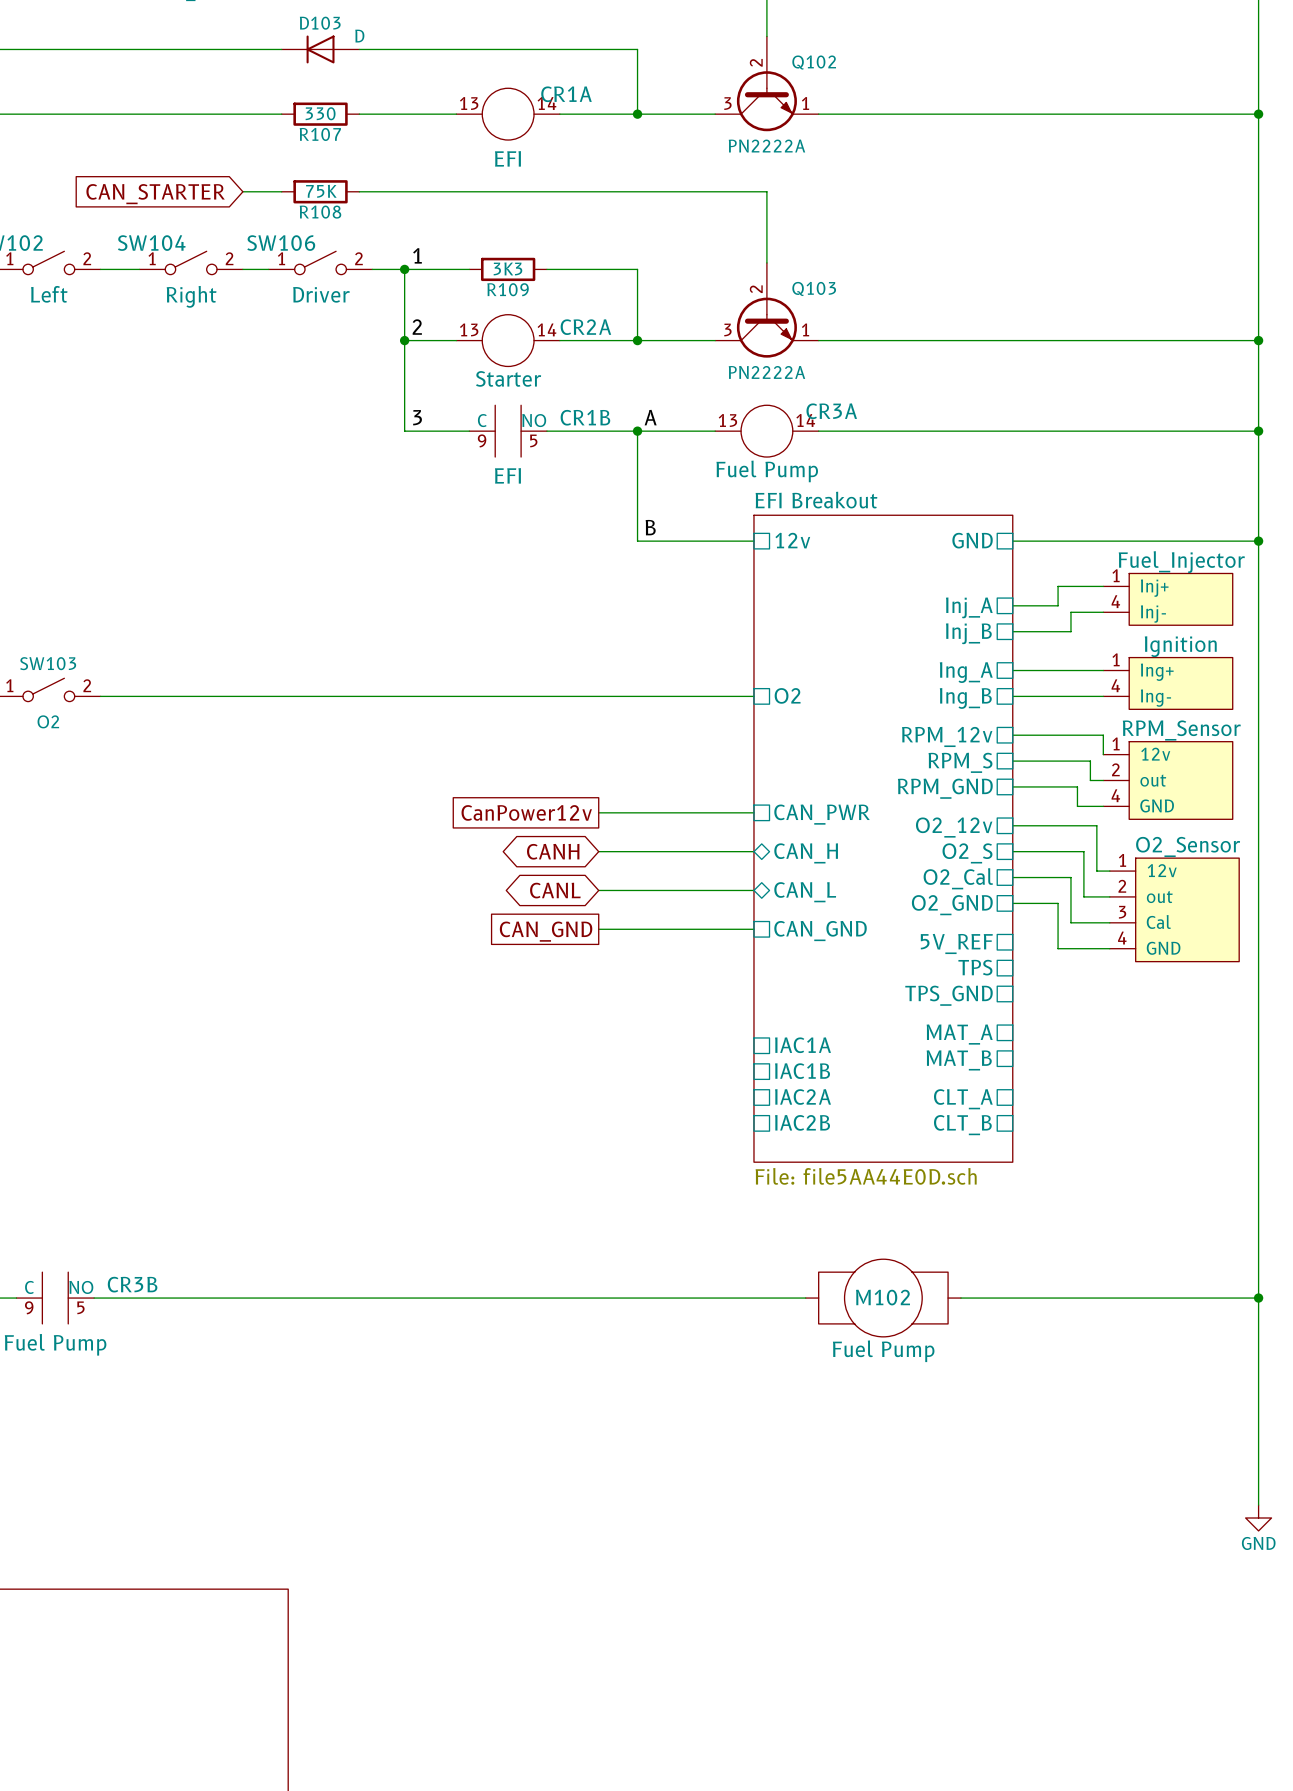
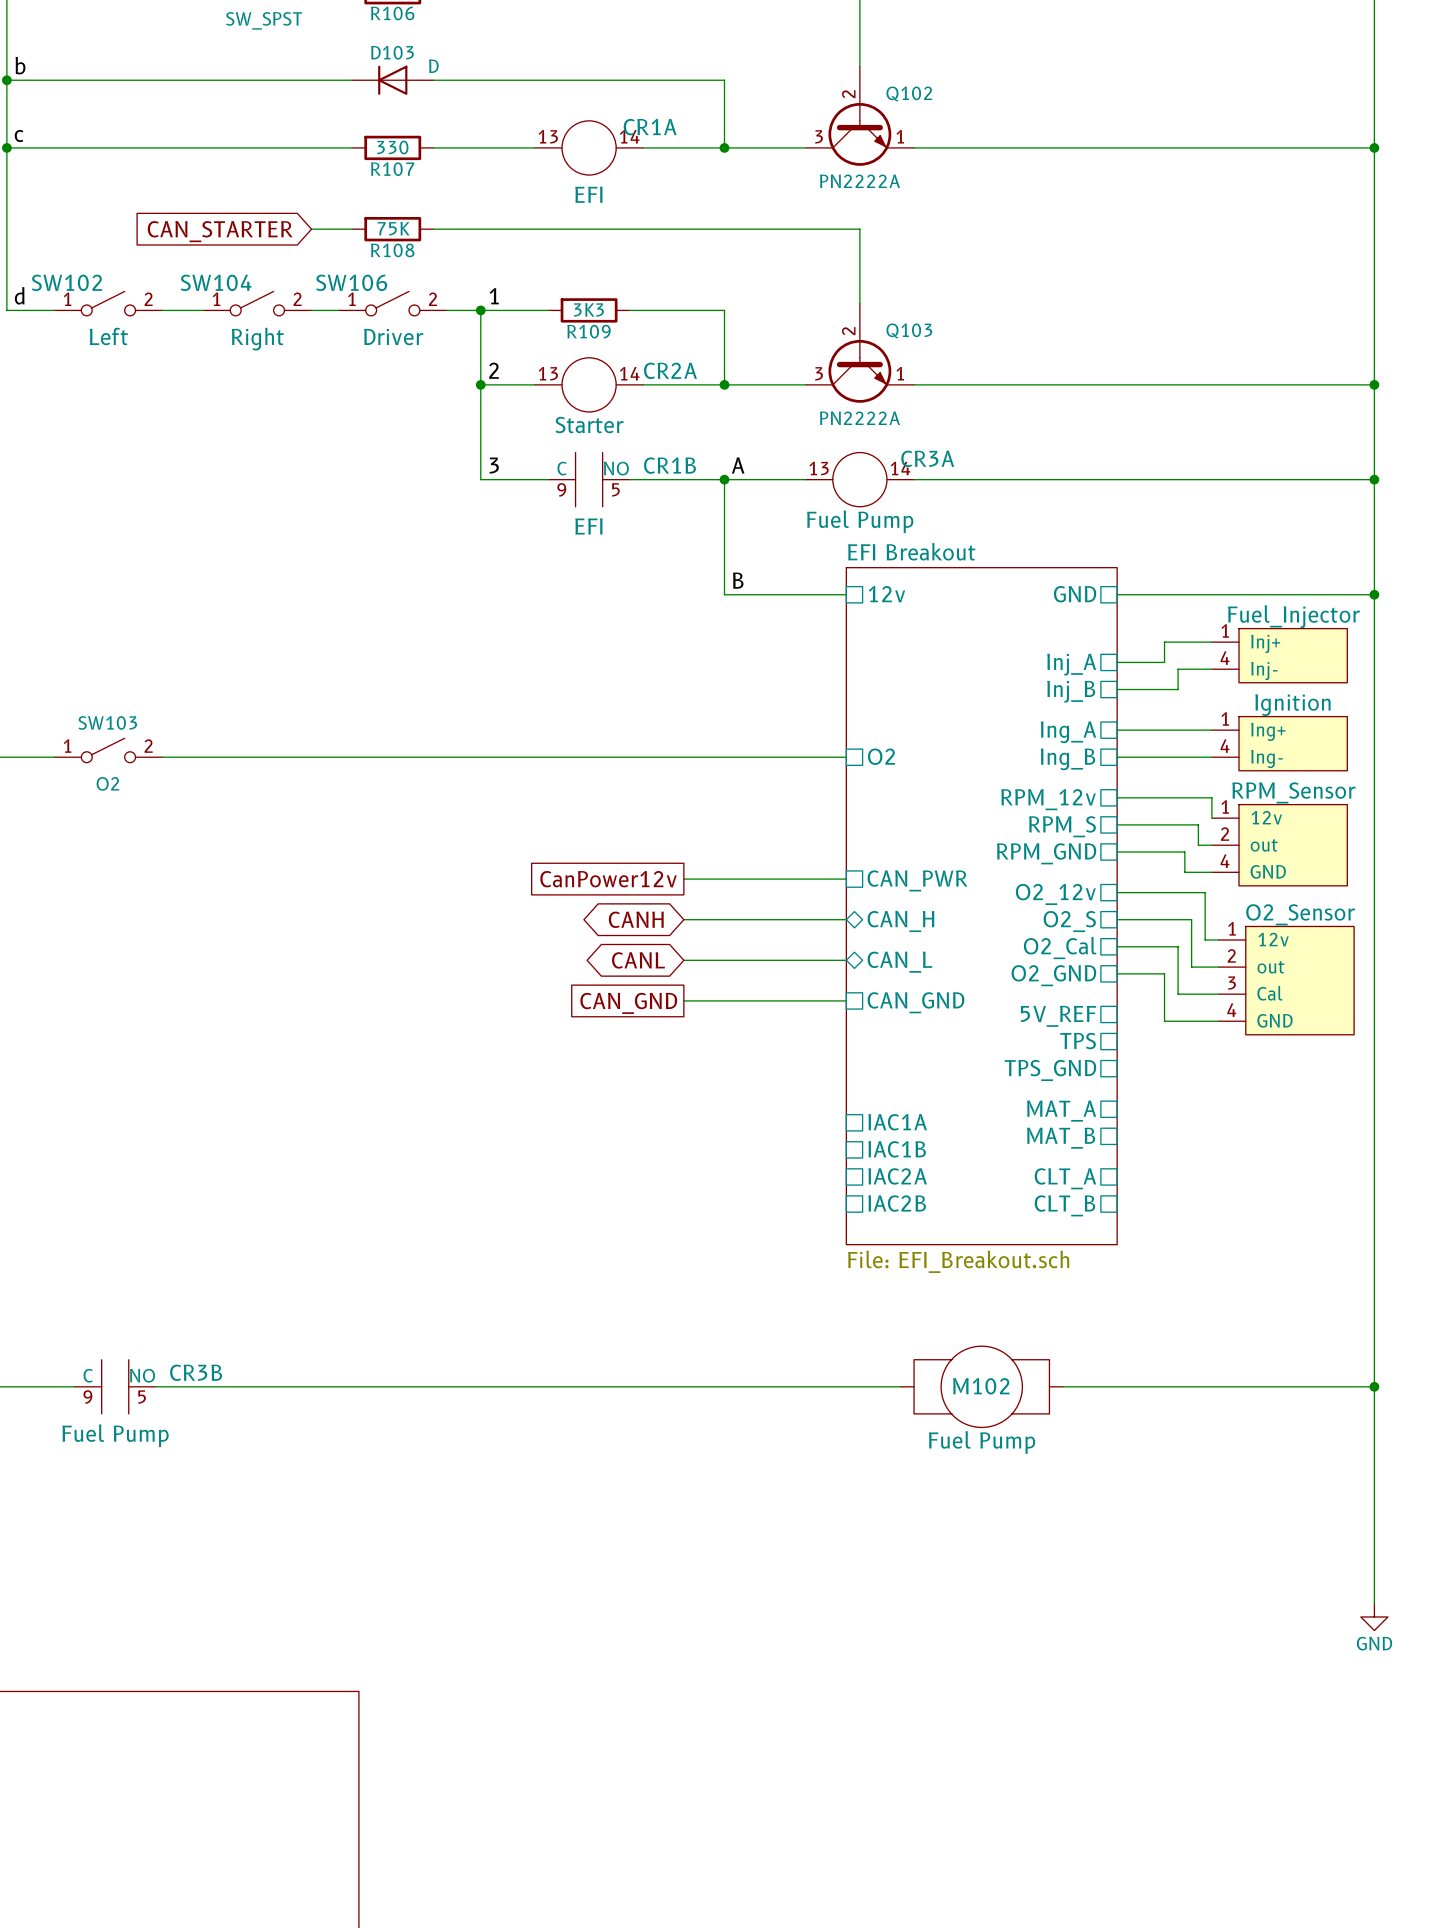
sheet EFI Breakout value: File: file5AA44E0D.sch (866, 1176) -> File: EFI_Breakout.sch (958, 1261)

